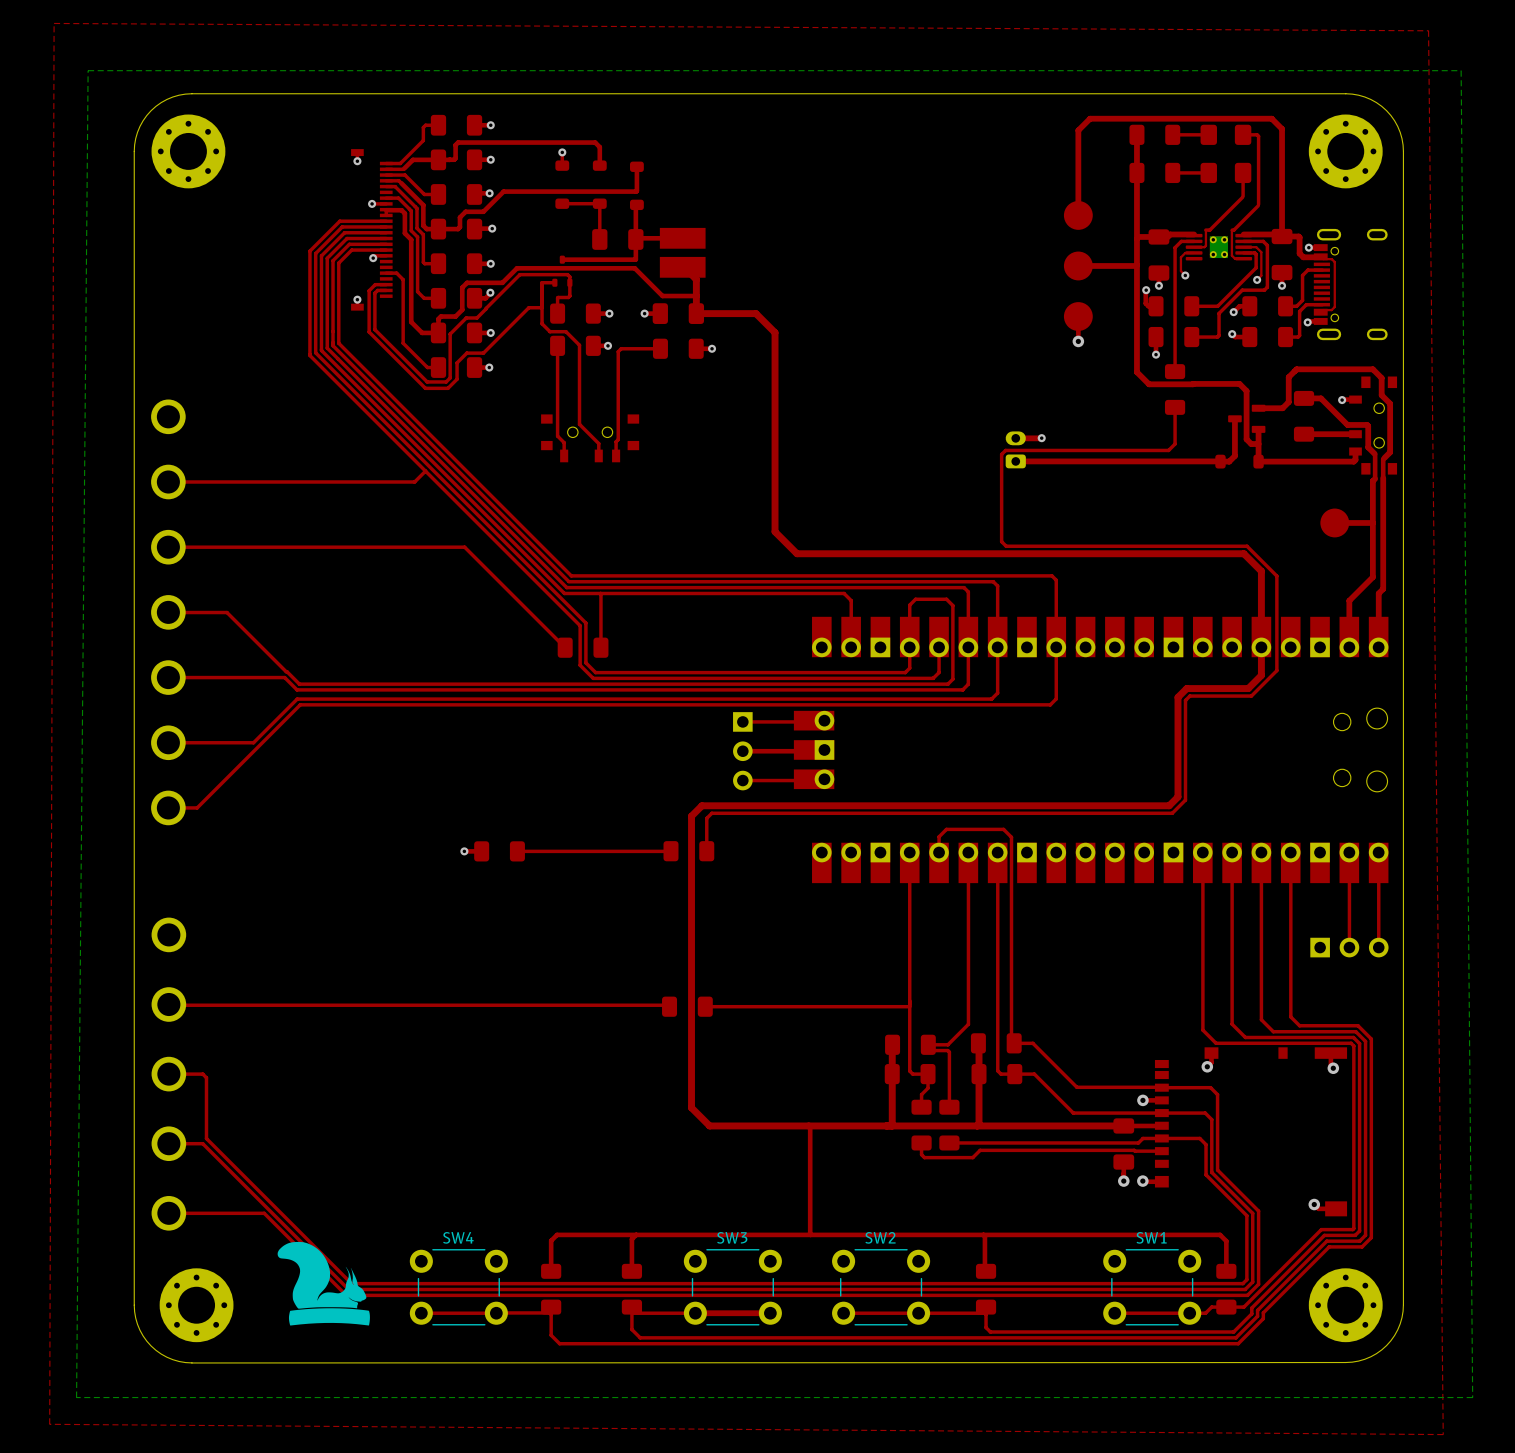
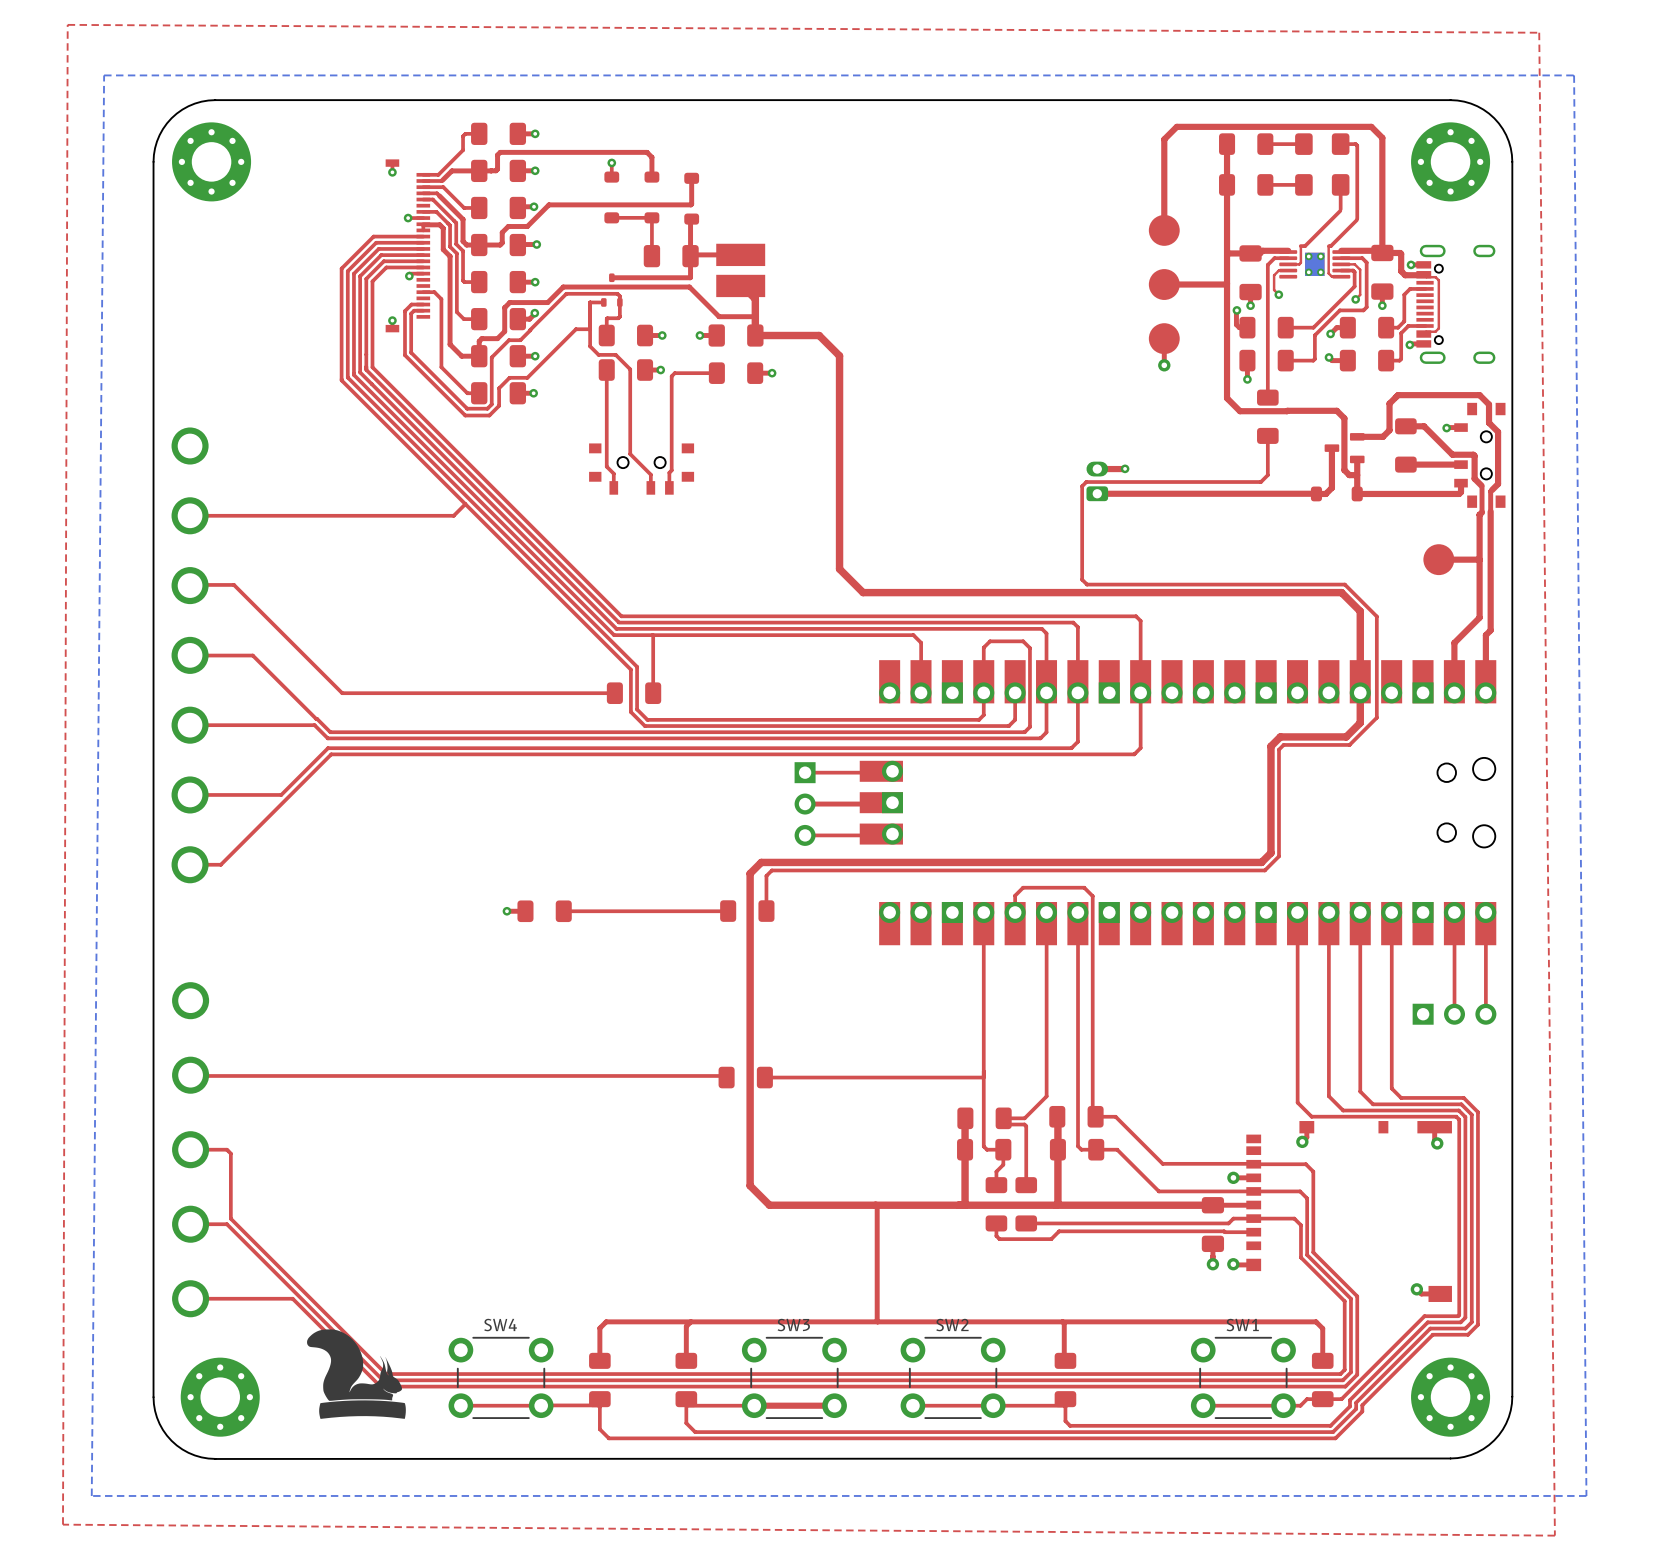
top track: (168, 547) (464, 547) (565, 647) -> (190, 584) (233, 584) (342, 693) (614, 693)

